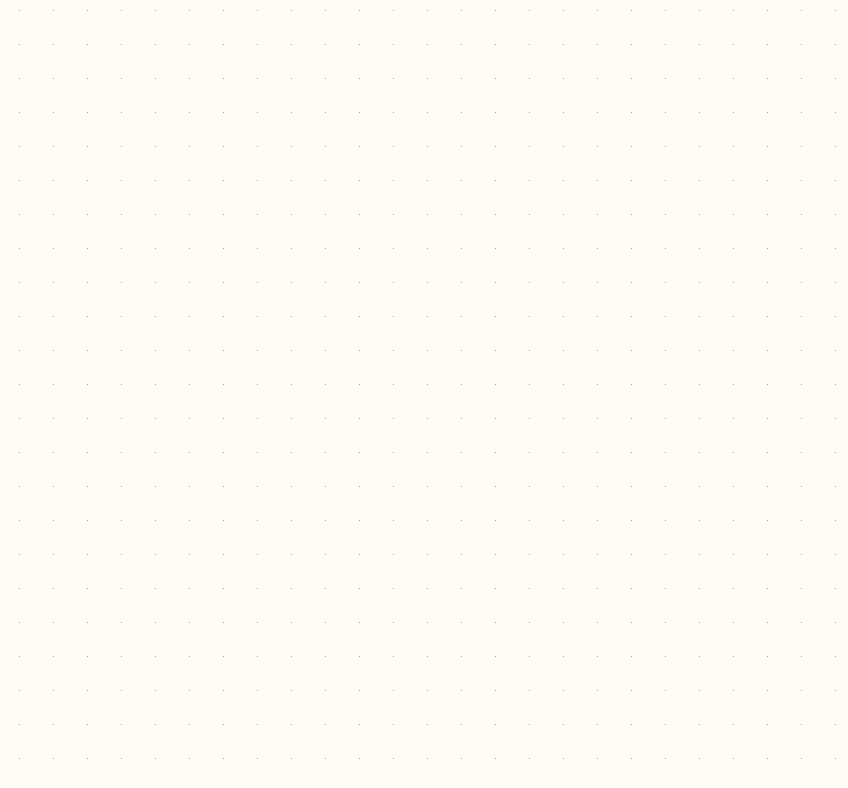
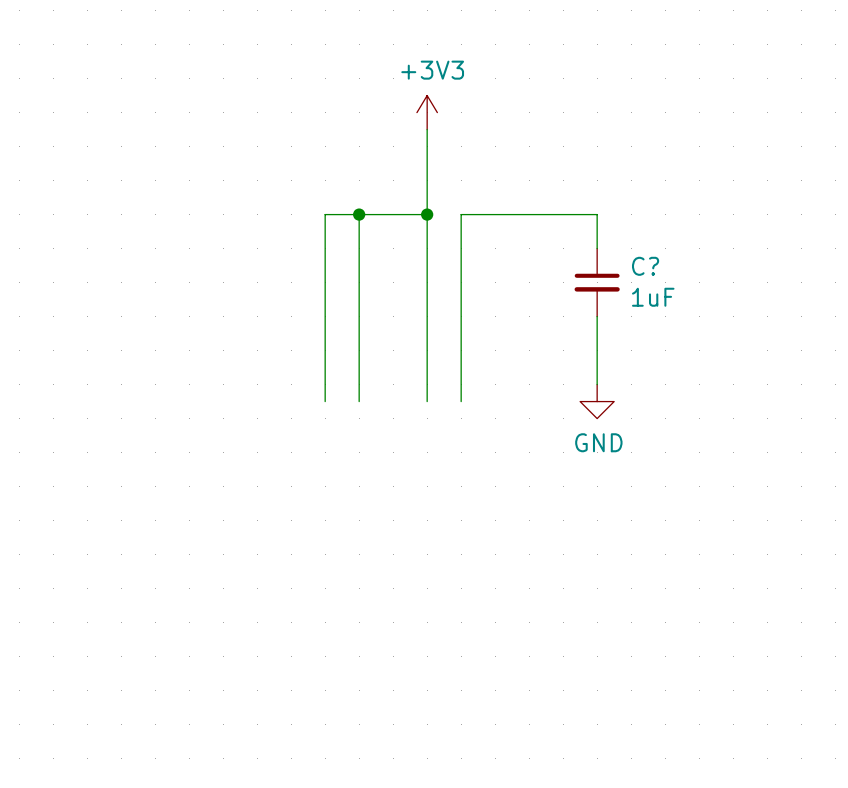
power symbol: none -> +3V3 (427, 112)
wire: none -> (427, 129) (427, 401)
wire: none -> (359, 214) (359, 401)
junction: none -> (359, 214)
wire: none -> (427, 214) (325, 214) (325, 401)
junction: none -> (427, 214)
wire: none -> (597, 248) (597, 214) (461, 214) (461, 401)
C?: none -> 1uF (597, 282)
wire: none -> (597, 316) (597, 384)
power symbol: none -> GND (597, 401)

